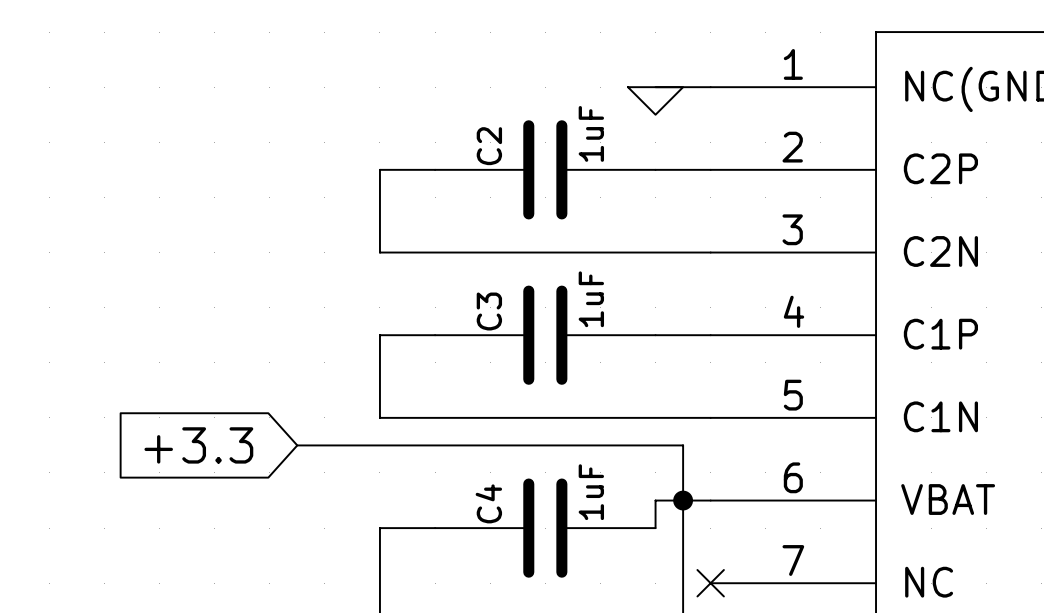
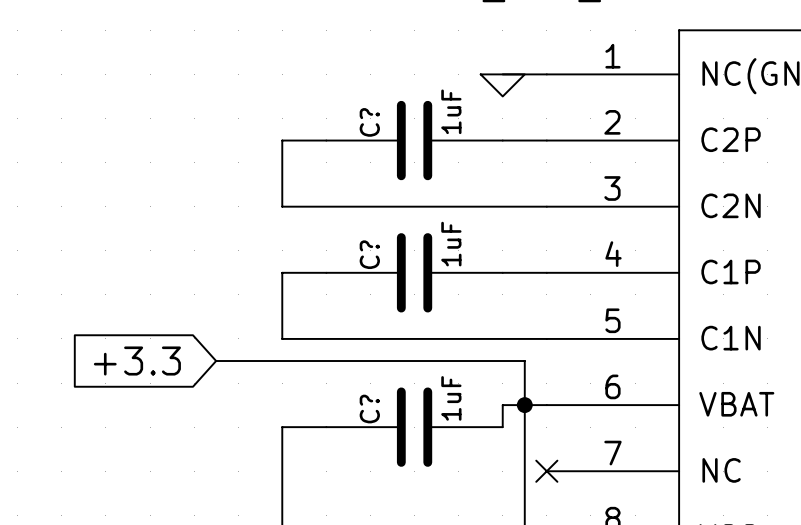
C2 name: C2 (489, 146) -> C? (369, 122)
C3 name: C3 (489, 311) -> C? (369, 254)
C4 name: C4 (488, 503) -> C? (369, 409)

